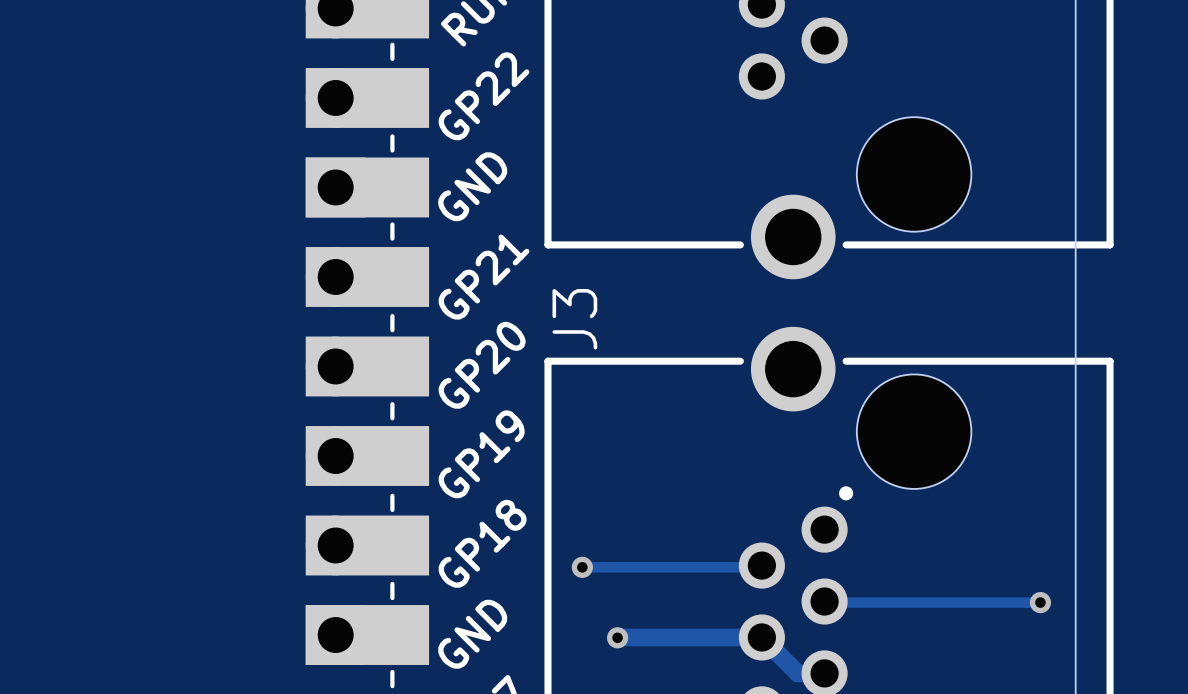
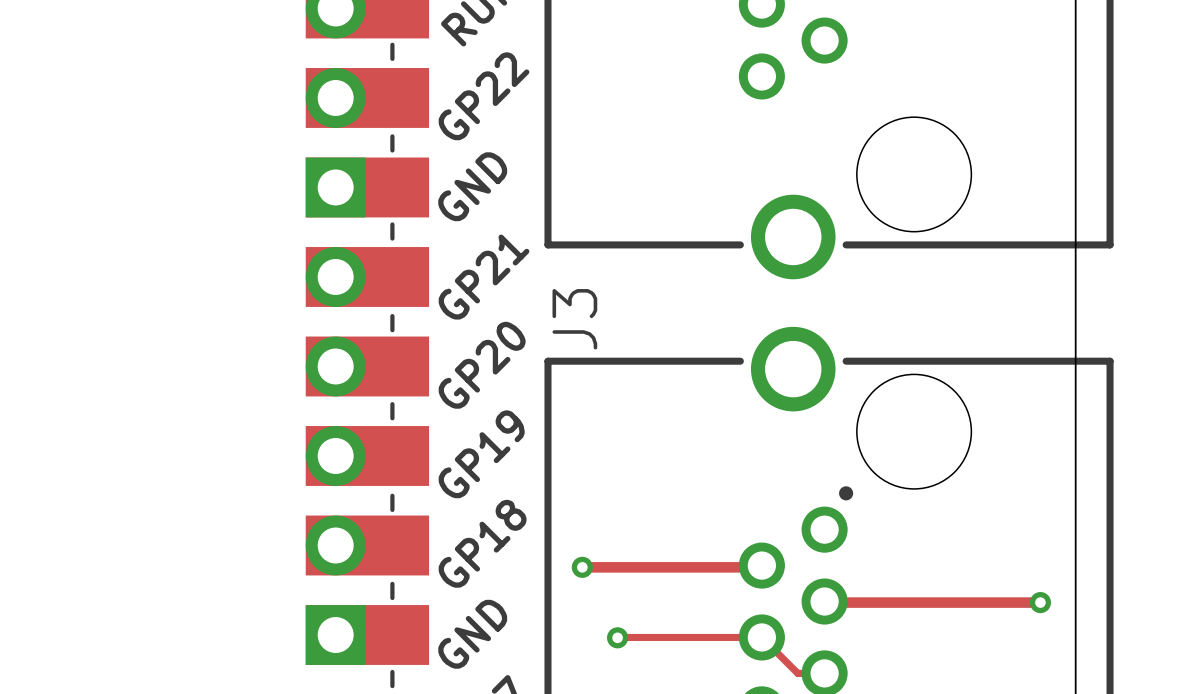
track width: thick (617, 637) (761, 637) (797, 673) (824, 673) -> thin (617, 637) (761, 637) (797, 673) (824, 673)

